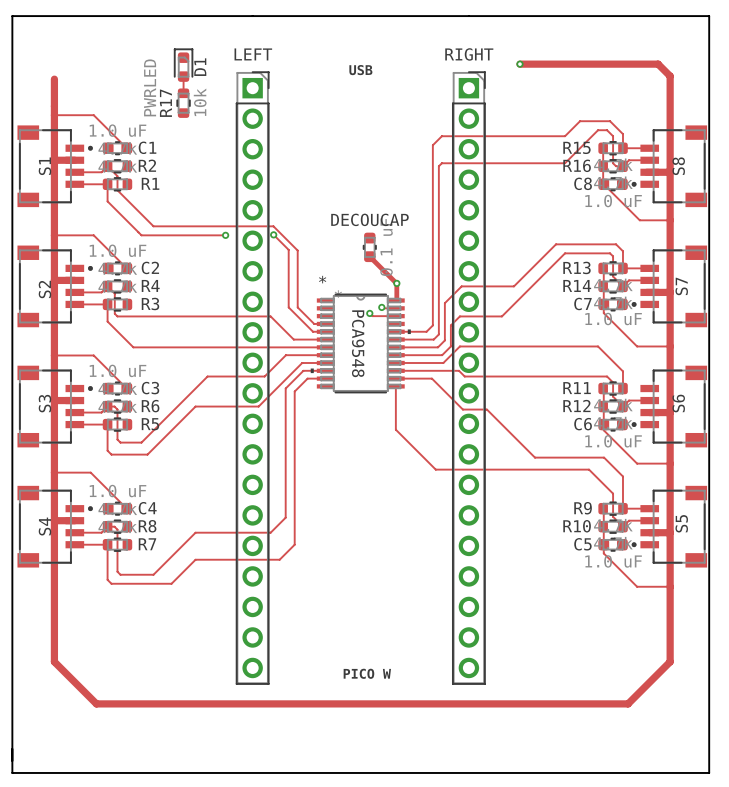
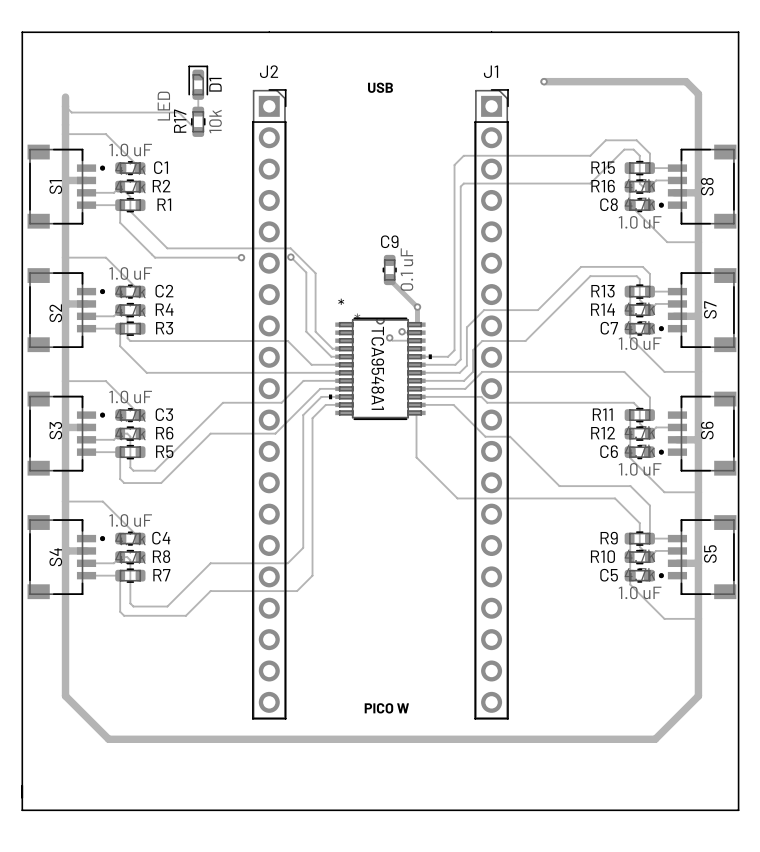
LEFT name: LEFT (253, 54) -> J2 (269, 71)
RIGHT name: RIGHT (469, 54) -> J1 (491, 71)
D1 value: PWRLED (150, 87) -> LED (163, 106)
track: none -> (65, 106) (71, 112) (178, 112) (198, 131)
DECOUCAP name: DECOUCAP (369, 219) -> C9 (389, 241)
PCA9548 name: PCA9548 (358, 343) -> TCA9548A1 (377, 368)

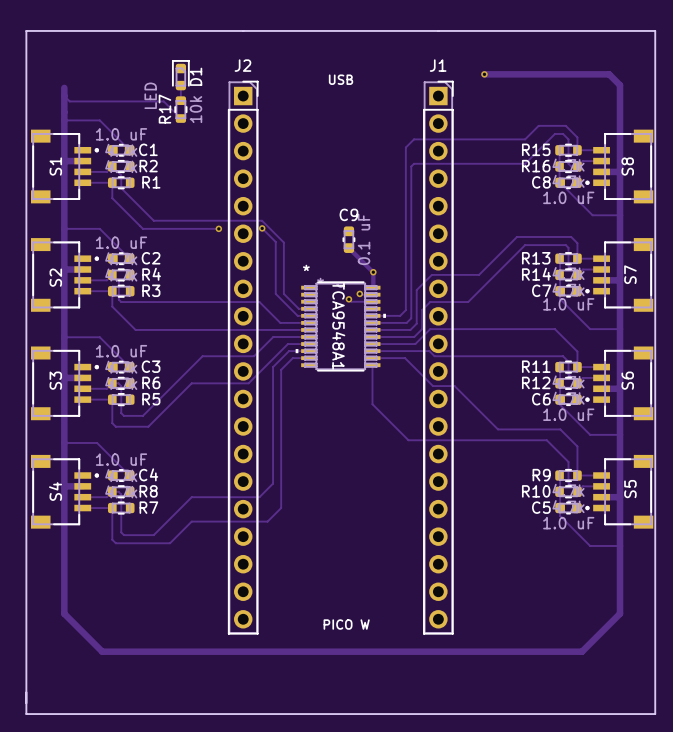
track: none -> (577, 367) (601, 367)

